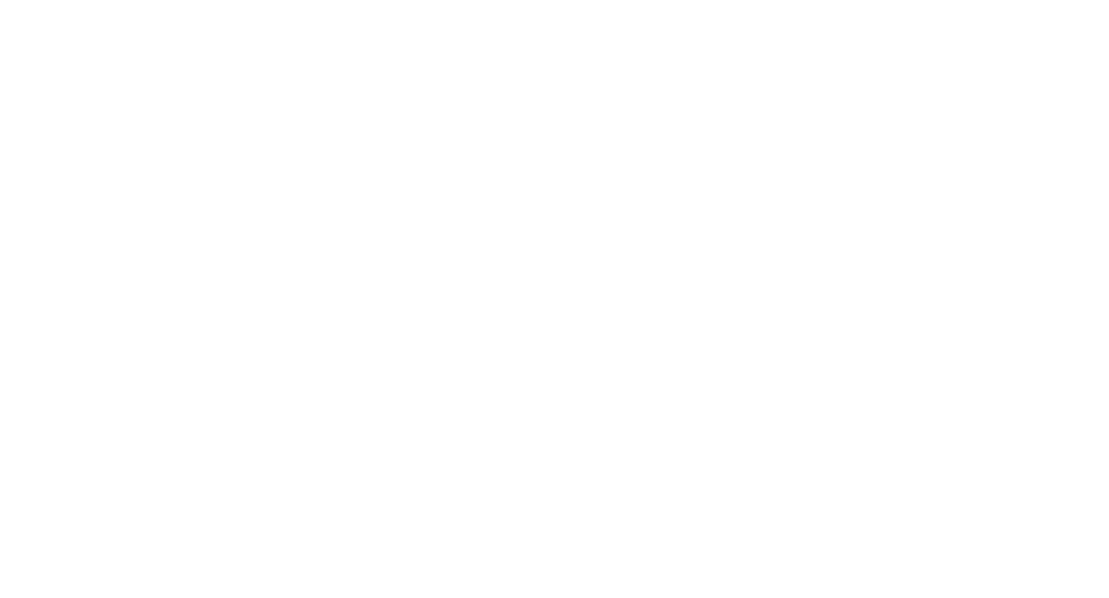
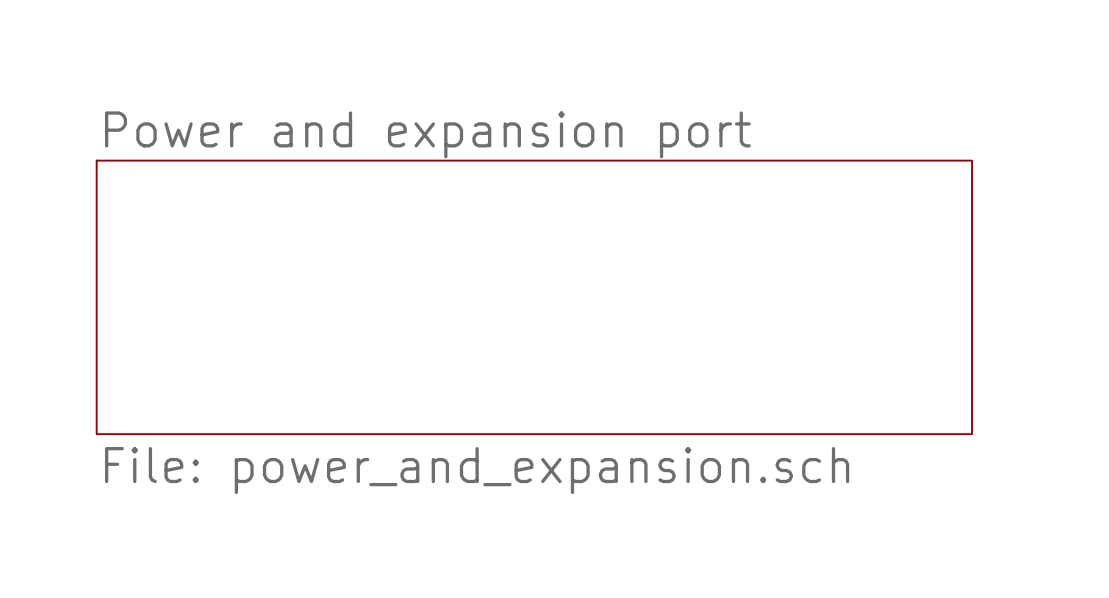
sheet Power and expansion port: none -> File: power_and_expansion.sch (534, 297)

